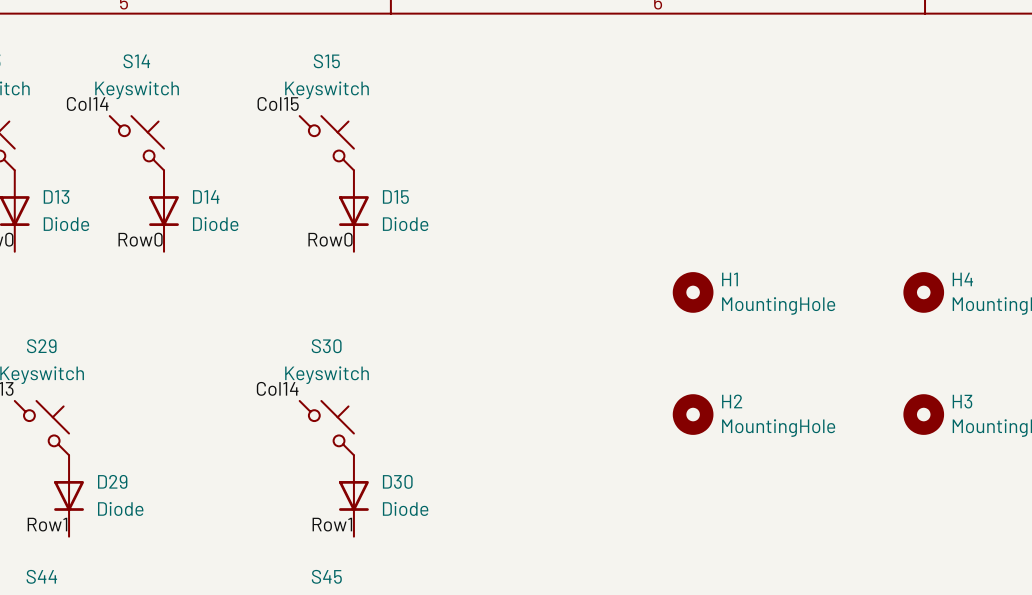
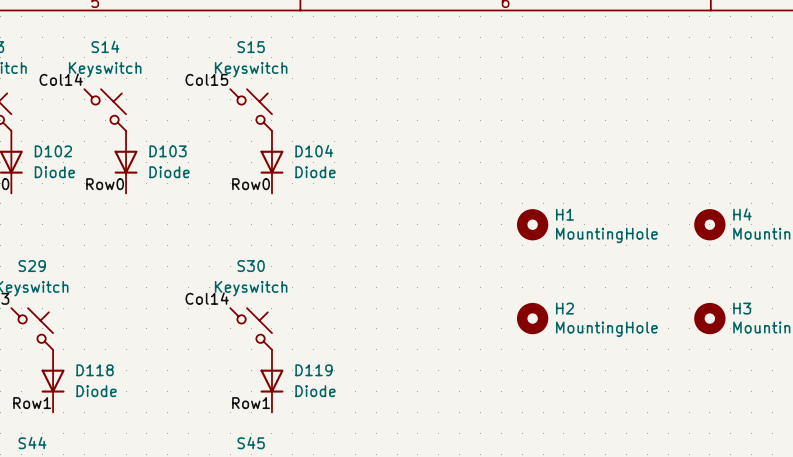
D14 name: D14 (206, 196) -> D103 (168, 151)
D13 name: D13 (56, 197) -> D102 (53, 151)
D15 name: D15 (395, 197) -> D104 (314, 151)
D29 name: D29 (112, 481) -> D118 (95, 370)
D30 name: D30 (397, 481) -> D119 (314, 370)

